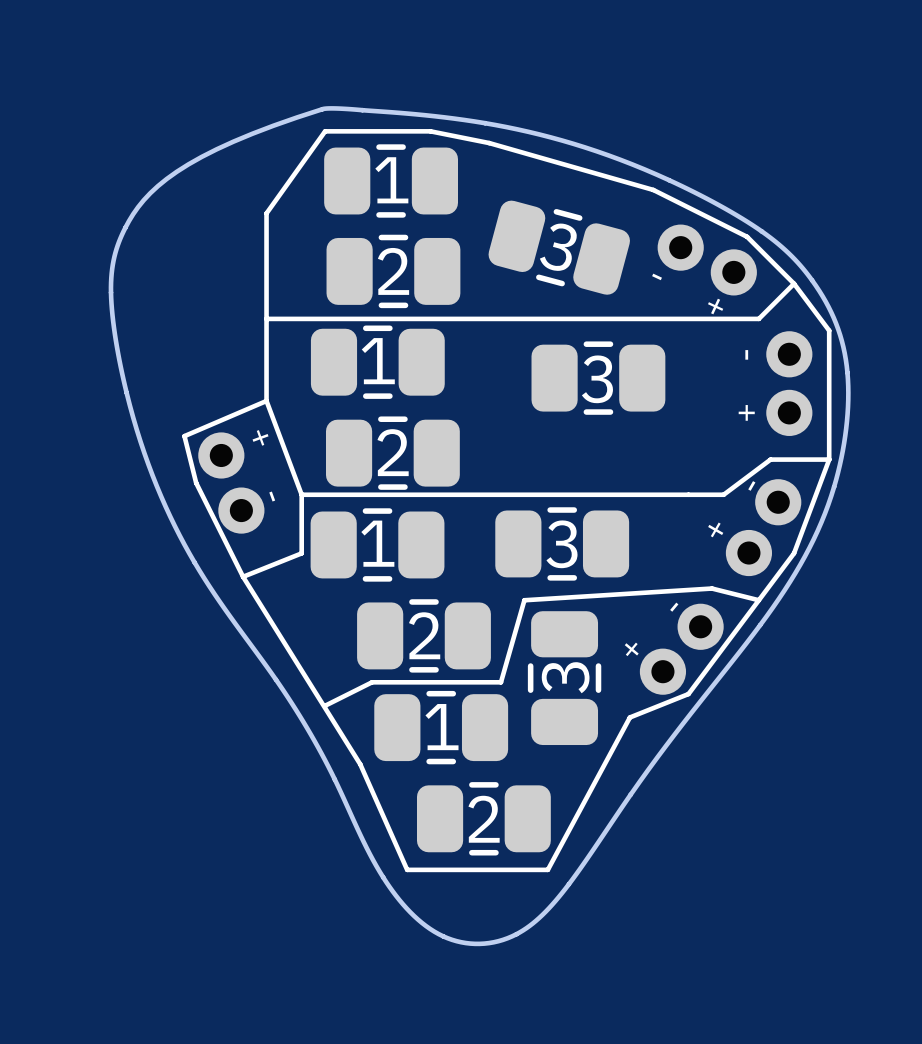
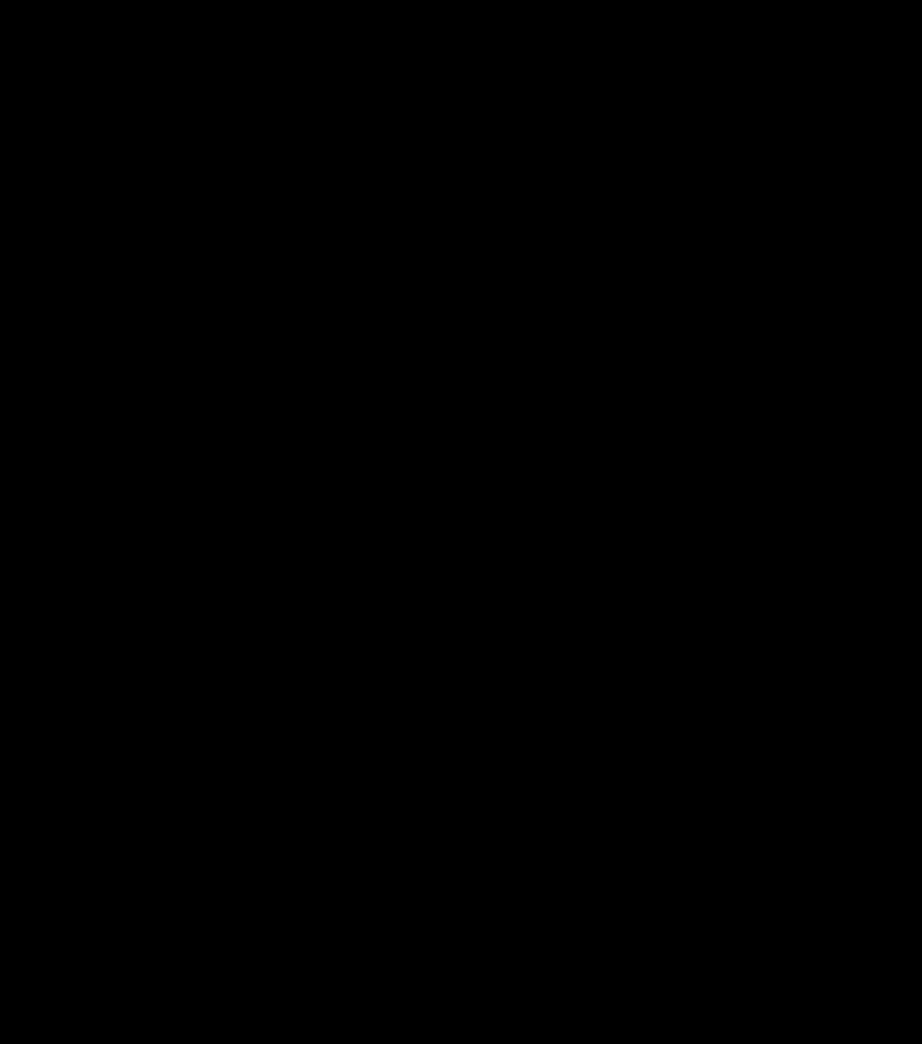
board edge: (322, 109) (252, 133) (201, 156) (166, 178) (138, 207) (119, 241) (111, 273) (112, 315) (120, 366) (144, 453) (161, 496) (179, 535) (209, 586) (275, 679) (307, 728) (383, 877) (406, 908) (434, 931) (461, 942) (479, 943) (493, 942) (512, 936) (526, 928) (542, 915) (558, 897) (648, 769) (760, 625) (795, 573) (821, 522) (839, 465) (848, 407) (847, 379) (844, 353) (838, 329) (825, 301) (809, 277) (791, 256) (770, 237) (747, 221) (675, 183) (596, 151) (517, 129) (424, 115) (345, 108) (322, 109) -> none
text: 1 (391, 180) -> none
part: (391, 181) -> none
text: 3 (558, 247) -> none
part: (559, 247) -> none
part: (707, 260) -> none
part: (393, 271) -> none
text: 2 (393, 271) -> none
line: (794, 283) (758, 318) (266, 318) -> none
line: (794, 283) (747, 236) (653, 189) (489, 143) (430, 131) (325, 131) (266, 213) (266, 400) -> none
line: (794, 283) (829, 330) (829, 459) -> none
text: 1 (378, 361) -> none
part: (377, 362) -> none
part: (598, 378) -> none
text: 3 (597, 379) -> none
part: (789, 383) -> none
line: (266, 400) (184, 436) (196, 483) (243, 576) -> none
line: (266, 400) (301, 494) -> none
text: 2 (393, 452) -> none
part: (392, 453) -> none
line: (829, 459) (770, 459) (723, 494) (301, 494) -> none
line: (829, 459) (794, 553) (688, 694) (629, 717) (547, 869) (407, 869) (360, 764) (243, 576) -> none
part: (231, 483) -> none
line: (301, 494) (301, 553) (243, 576) -> none
part: (763, 527) -> none
text: 1 (377, 543) -> none
part: (562, 543) -> none
part: (377, 544) -> none
text: 3 (561, 544) -> none
line: (758, 600) (711, 588) (524, 600) (500, 682) (372, 682) (325, 705) -> none
part: (424, 635) -> none
text: 2 (424, 635) -> none
part: (681, 649) -> none
text: 3 (565, 677) -> none
part: (564, 678) -> none
part: (441, 727) -> none
text: 1 (441, 727) -> none
part: (483, 818) -> none
text: 2 (484, 819) -> none

